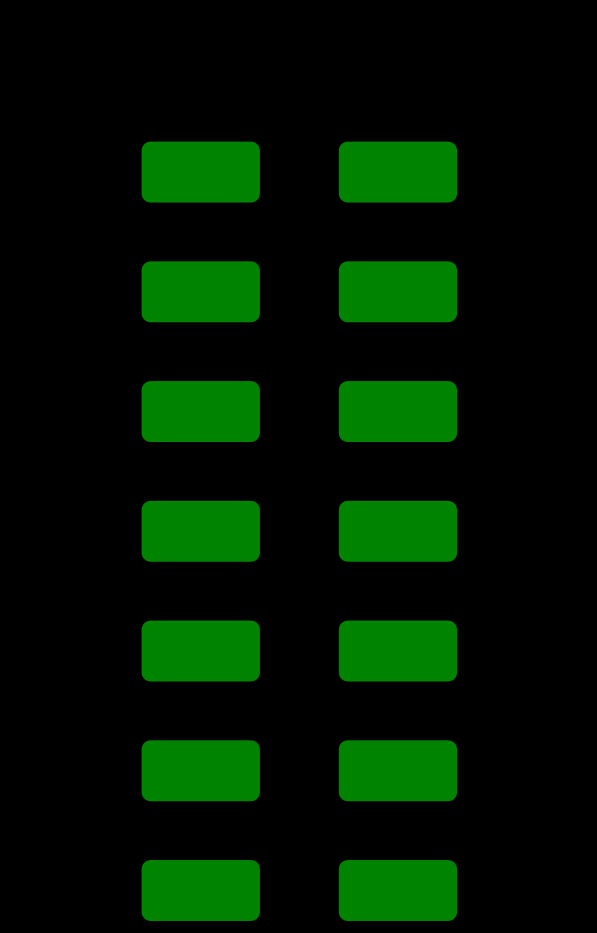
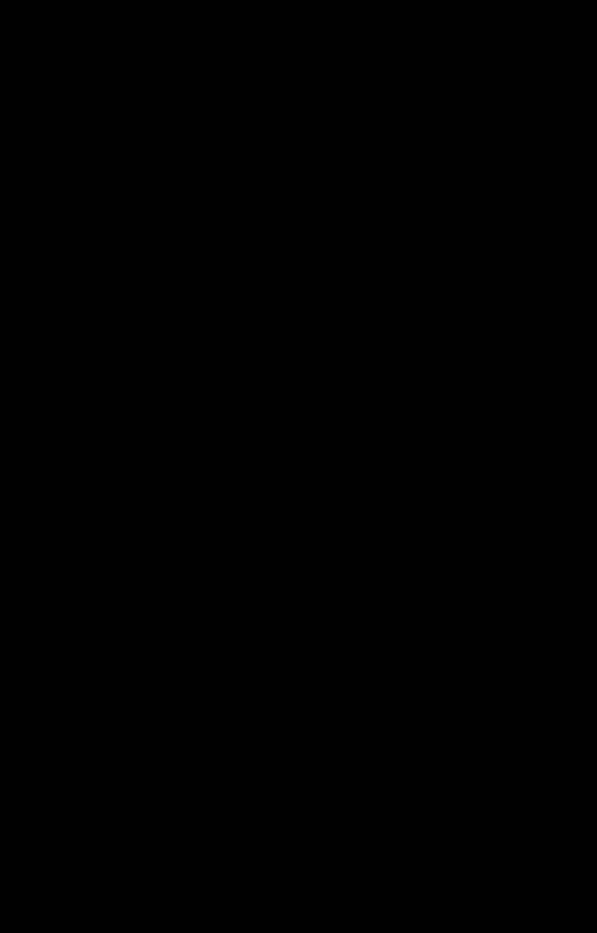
part: (299, 172) -> none
part: (299, 291) -> none
part: (299, 411) -> none
part: (299, 531) -> none
part: (299, 651) -> none
part: (299, 770) -> none
part: (299, 890) -> none

